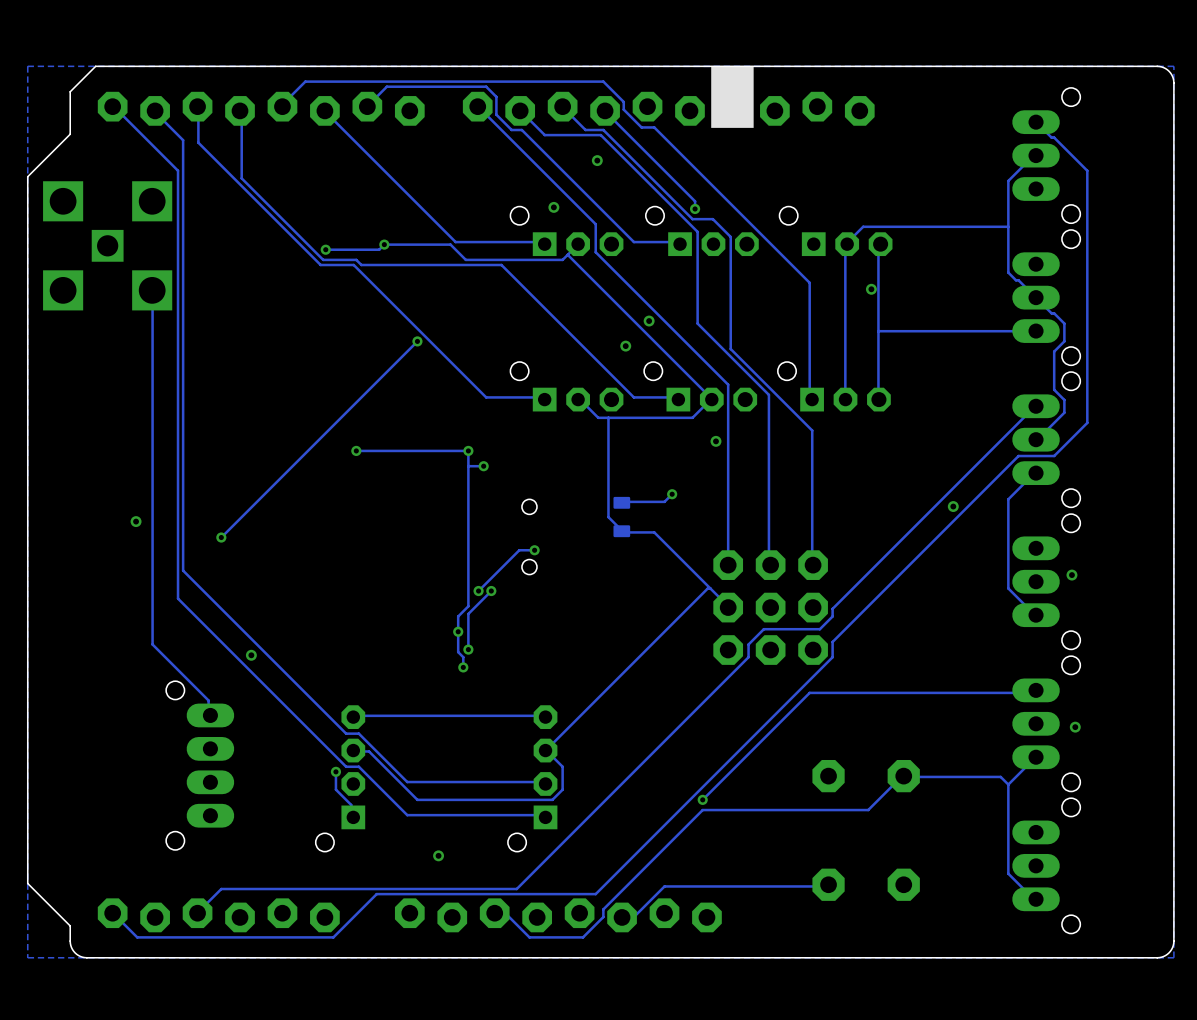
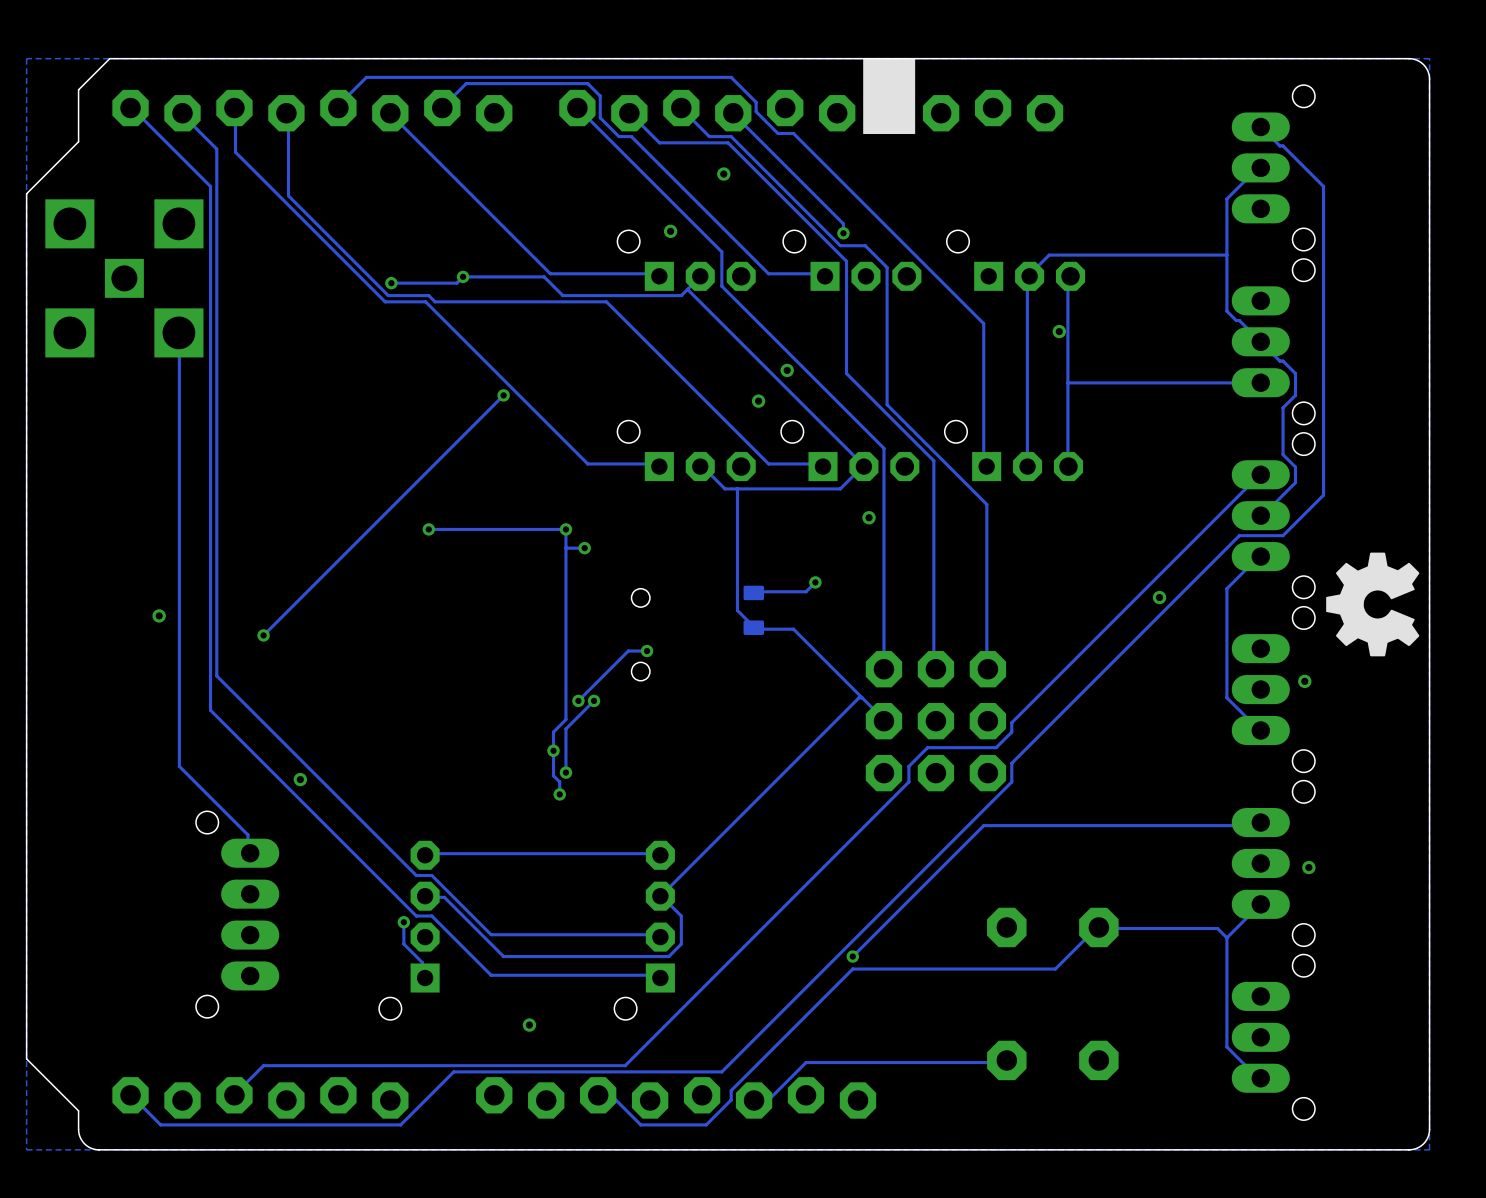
drawing: none -> [1326, 552, 1420, 657]

